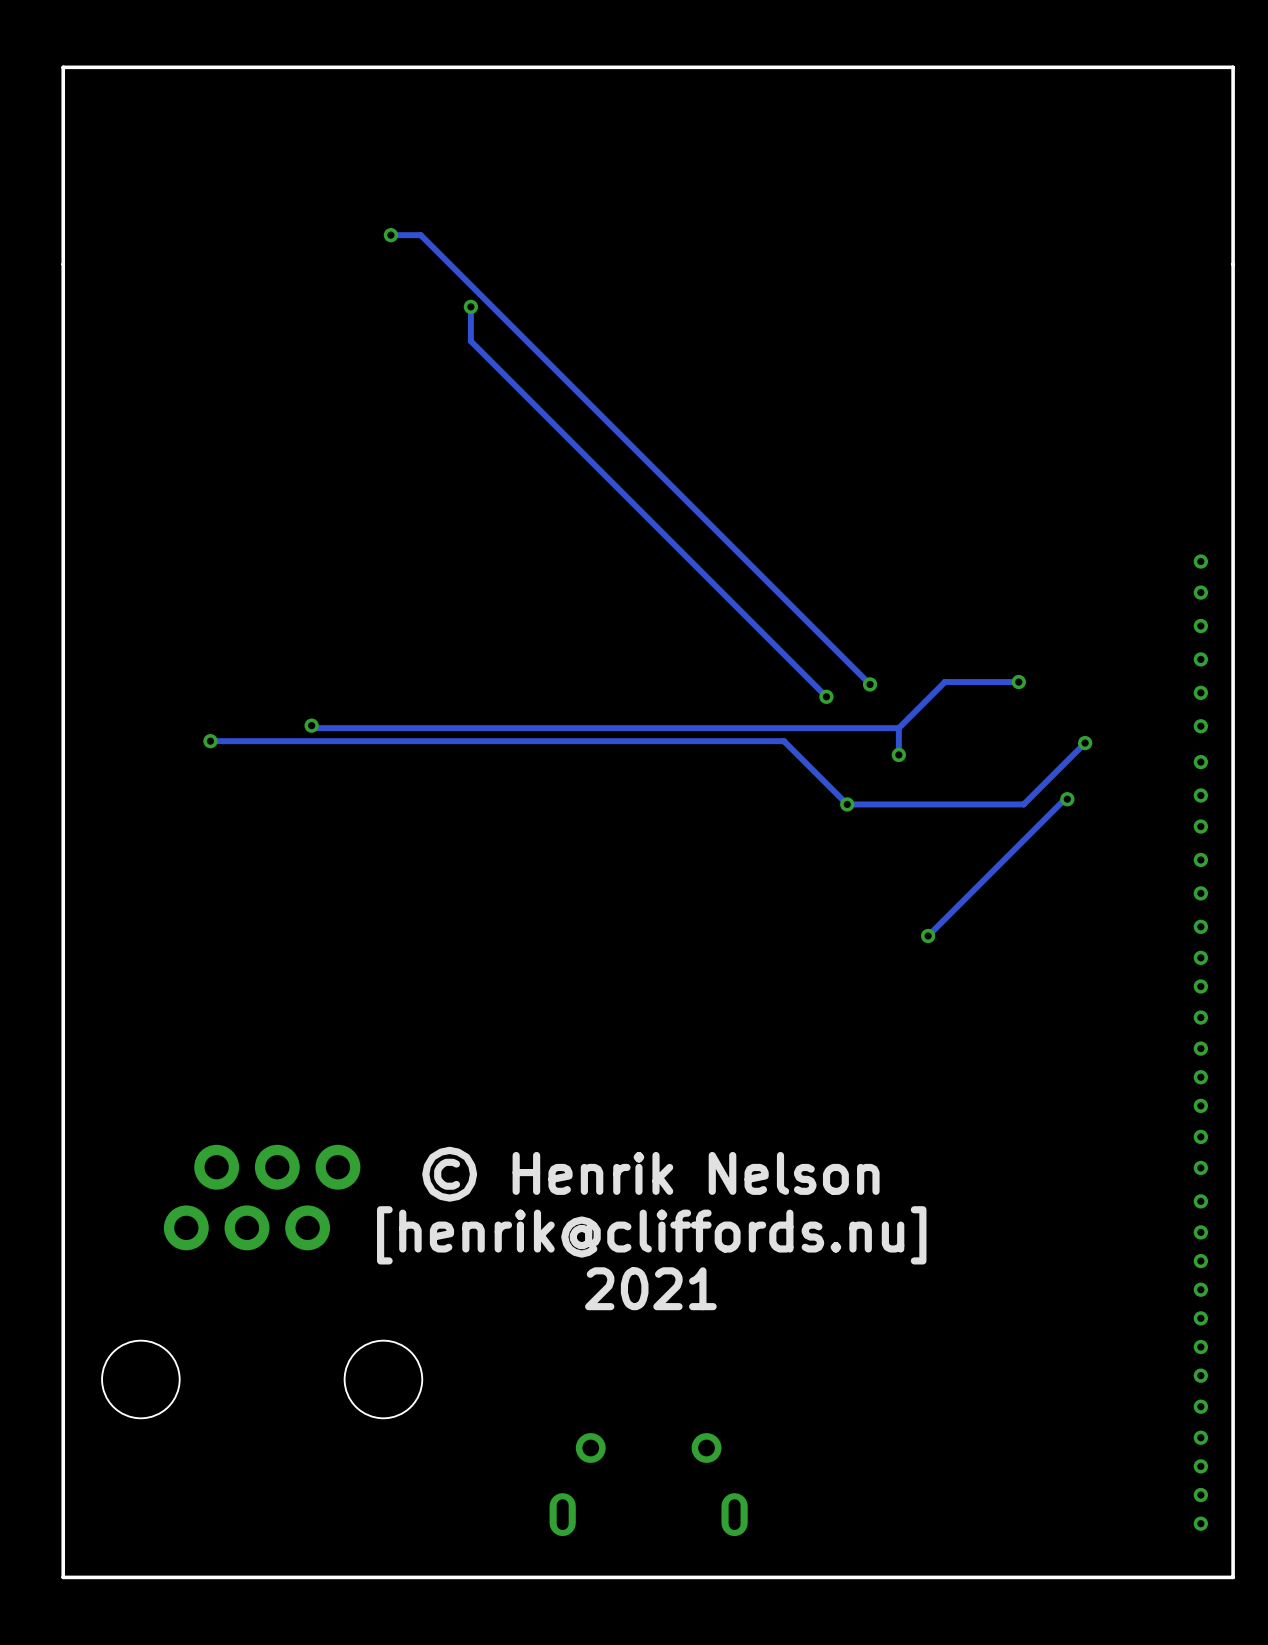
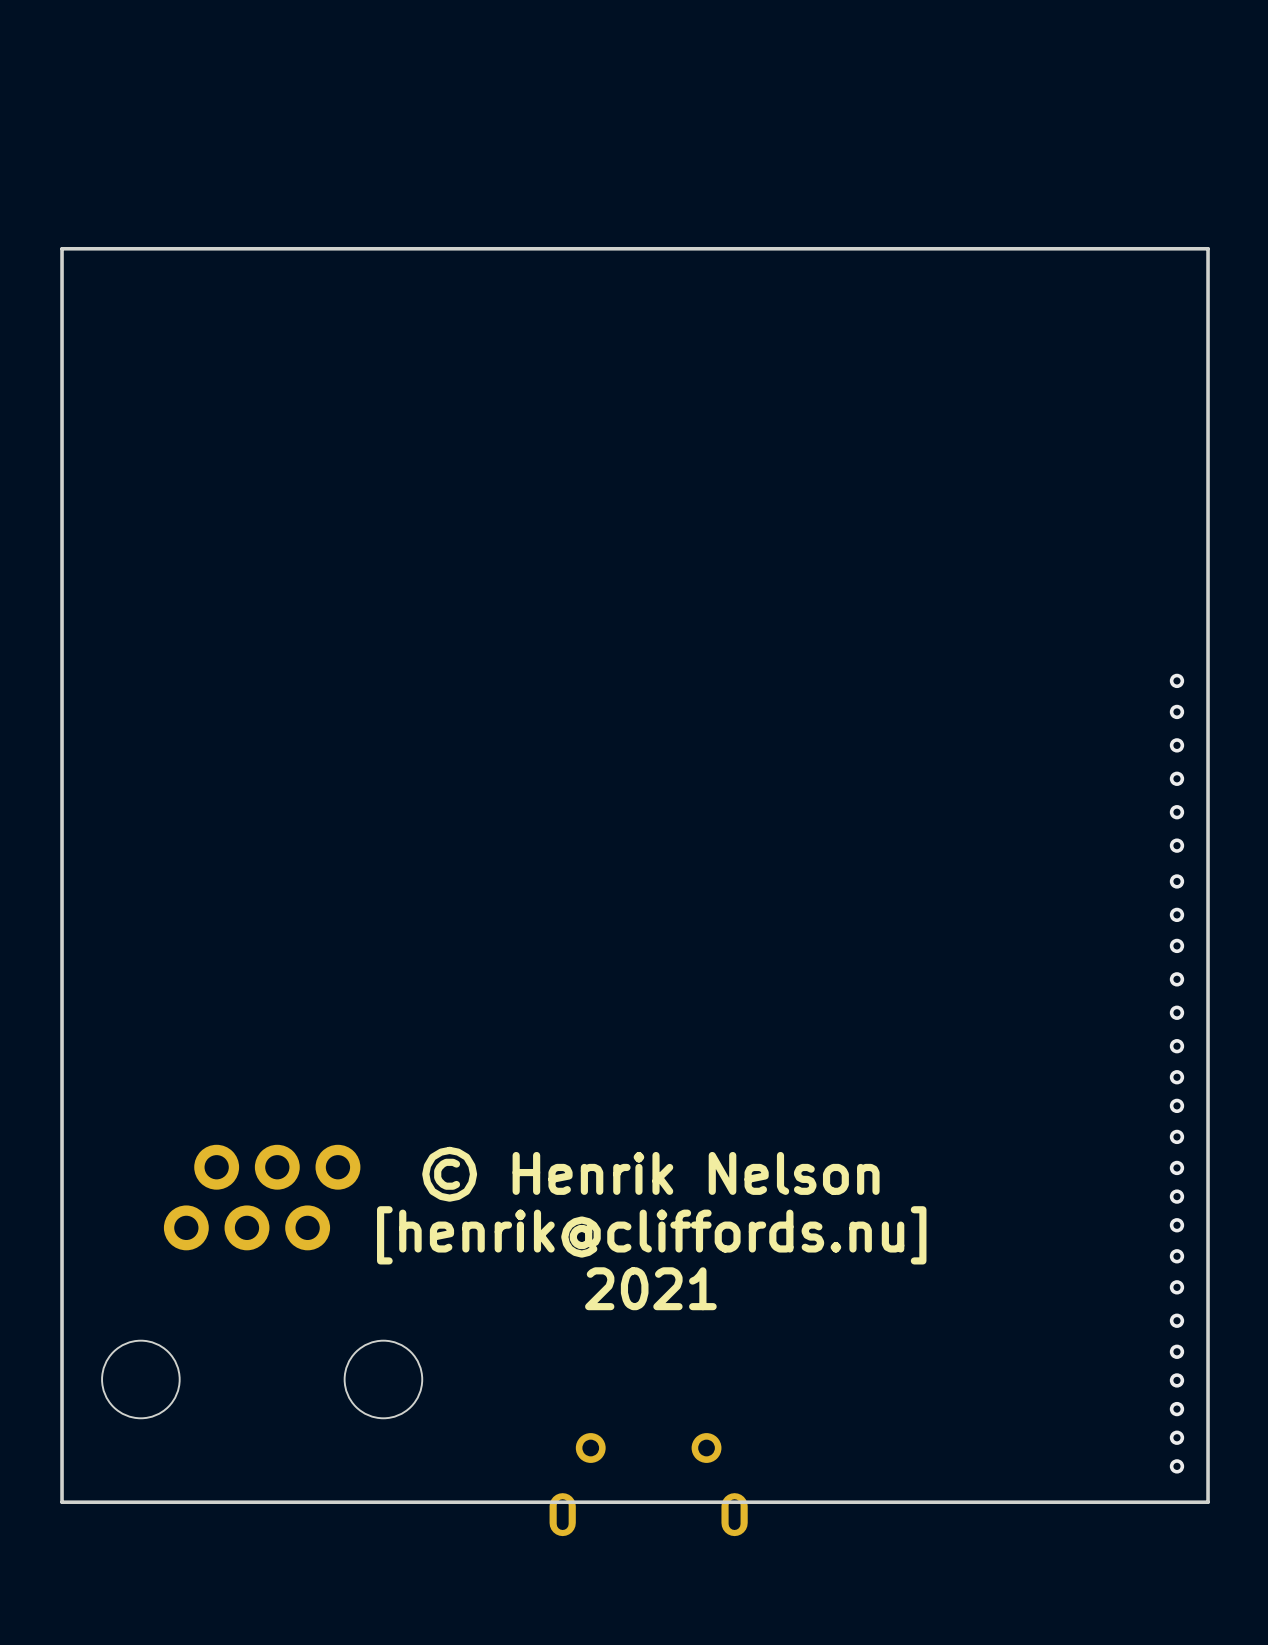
board edge: (1233, 67) (1233, 1577) (63, 1577) (63, 67) (1233, 67) -> (1208, 248) (1208, 1502) (62, 1502) (62, 248) (1208, 248)
track: (390, 235) (420, 235) (870, 684) -> none
via: (390, 235) -> none
track: (470, 306) (470, 341) (826, 696) -> none
via: (470, 306) -> none
via: (1200, 561) -> none
via: (1200, 592) -> none
via: (1200, 625) -> none
via: (1200, 659) -> none
via: none -> (1176, 680)
track: (1018, 682) (944, 682) (898, 728) -> none
via: (1018, 682) -> none
via: (870, 684) -> none
via: (1200, 692) -> none
via: (826, 696) -> none
via: none -> (1176, 711)
track: (311, 725) (314, 728) (898, 728) -> none
via: (311, 725) -> none
via: (1200, 726) -> none
track: (898, 728) (898, 754) -> none
track: (210, 741) (783, 741) (847, 804) (1023, 804) (1085, 743) -> none
via: (210, 741) -> none
via: (1085, 743) -> none
via: none -> (1176, 745)
via: (898, 754) -> none
via: (1200, 762) -> none
via: none -> (1176, 778)
via: (1200, 795) -> none
track: (1067, 799) (1064, 799) (928, 936) -> none
via: (1067, 799) -> none
via: (847, 804) -> none
via: none -> (1176, 812)
via: (1200, 826) -> none
via: none -> (1176, 845)
via: (1200, 859) -> none
via: none -> (1176, 881)
via: (1200, 893) -> none
via: none -> (1176, 914)
via: (1200, 926) -> none
via: (928, 936) -> none
via: none -> (1176, 945)
via: (1200, 957) -> none
via: none -> (1176, 979)
via: (1200, 986) -> none
via: none -> (1176, 1012)
via: (1200, 1017) -> none
via: none -> (1176, 1046)
via: (1200, 1048) -> none
via: none -> (1176, 1077)
via: (1200, 1077) -> none
via: none -> (1176, 1105)
via: (1200, 1105) -> none
via: none -> (1176, 1136)
via: (1200, 1136) -> none
via: none -> (1176, 1167)
via: (1200, 1167) -> none
via: none -> (1176, 1196)
via: (1200, 1201) -> none
via: none -> (1176, 1225)
via: (1200, 1232) -> none
via: none -> (1176, 1256)
via: (1200, 1261) -> none
via: none -> (1176, 1287)
via: (1200, 1289) -> none
via: (1200, 1318) -> none
via: none -> (1176, 1320)
via: (1200, 1347) -> none
via: none -> (1176, 1351)
via: (1200, 1375) -> none
via: none -> (1176, 1380)
via: (1200, 1406) -> none
via: none -> (1176, 1409)
via: none -> (1176, 1437)
via: (1200, 1437) -> none
via: none -> (1176, 1466)
via: (1200, 1466) -> none
via: (1200, 1495) -> none
via: (1200, 1523) -> none

